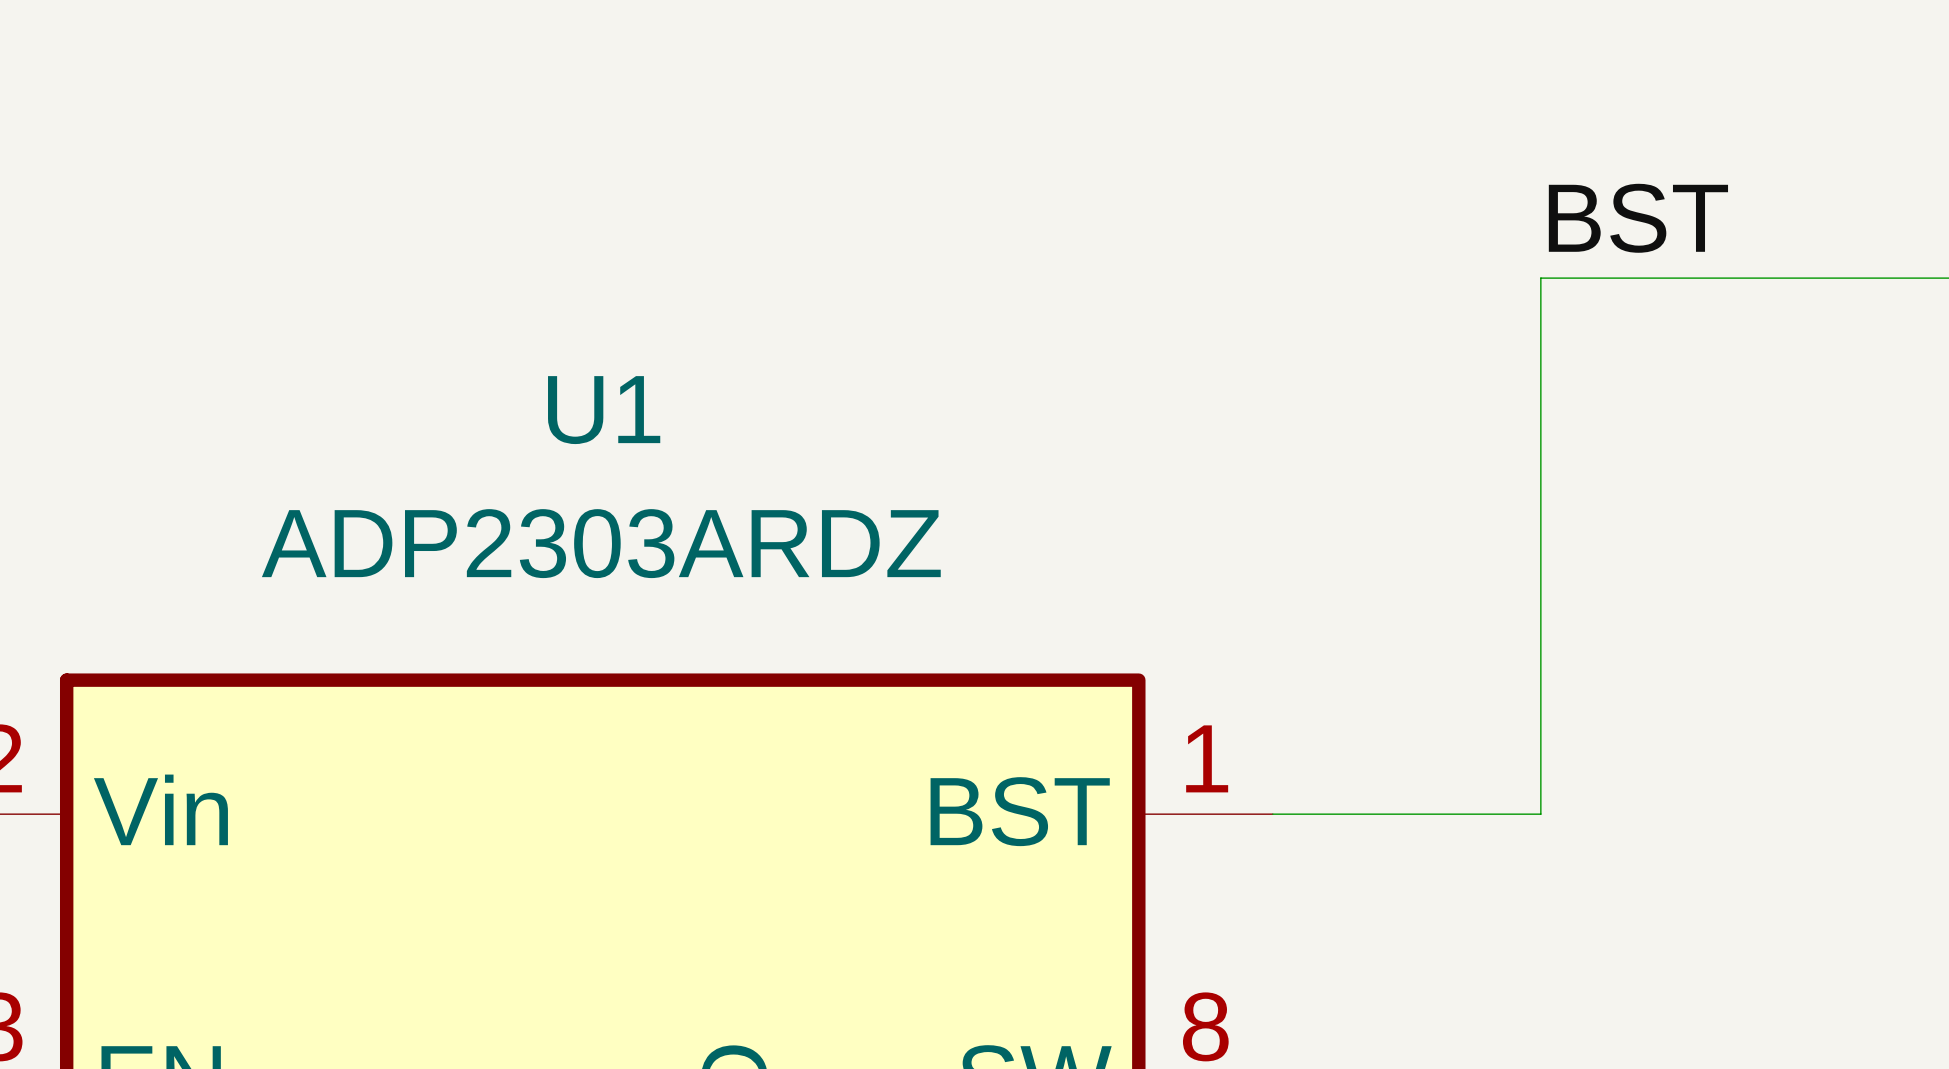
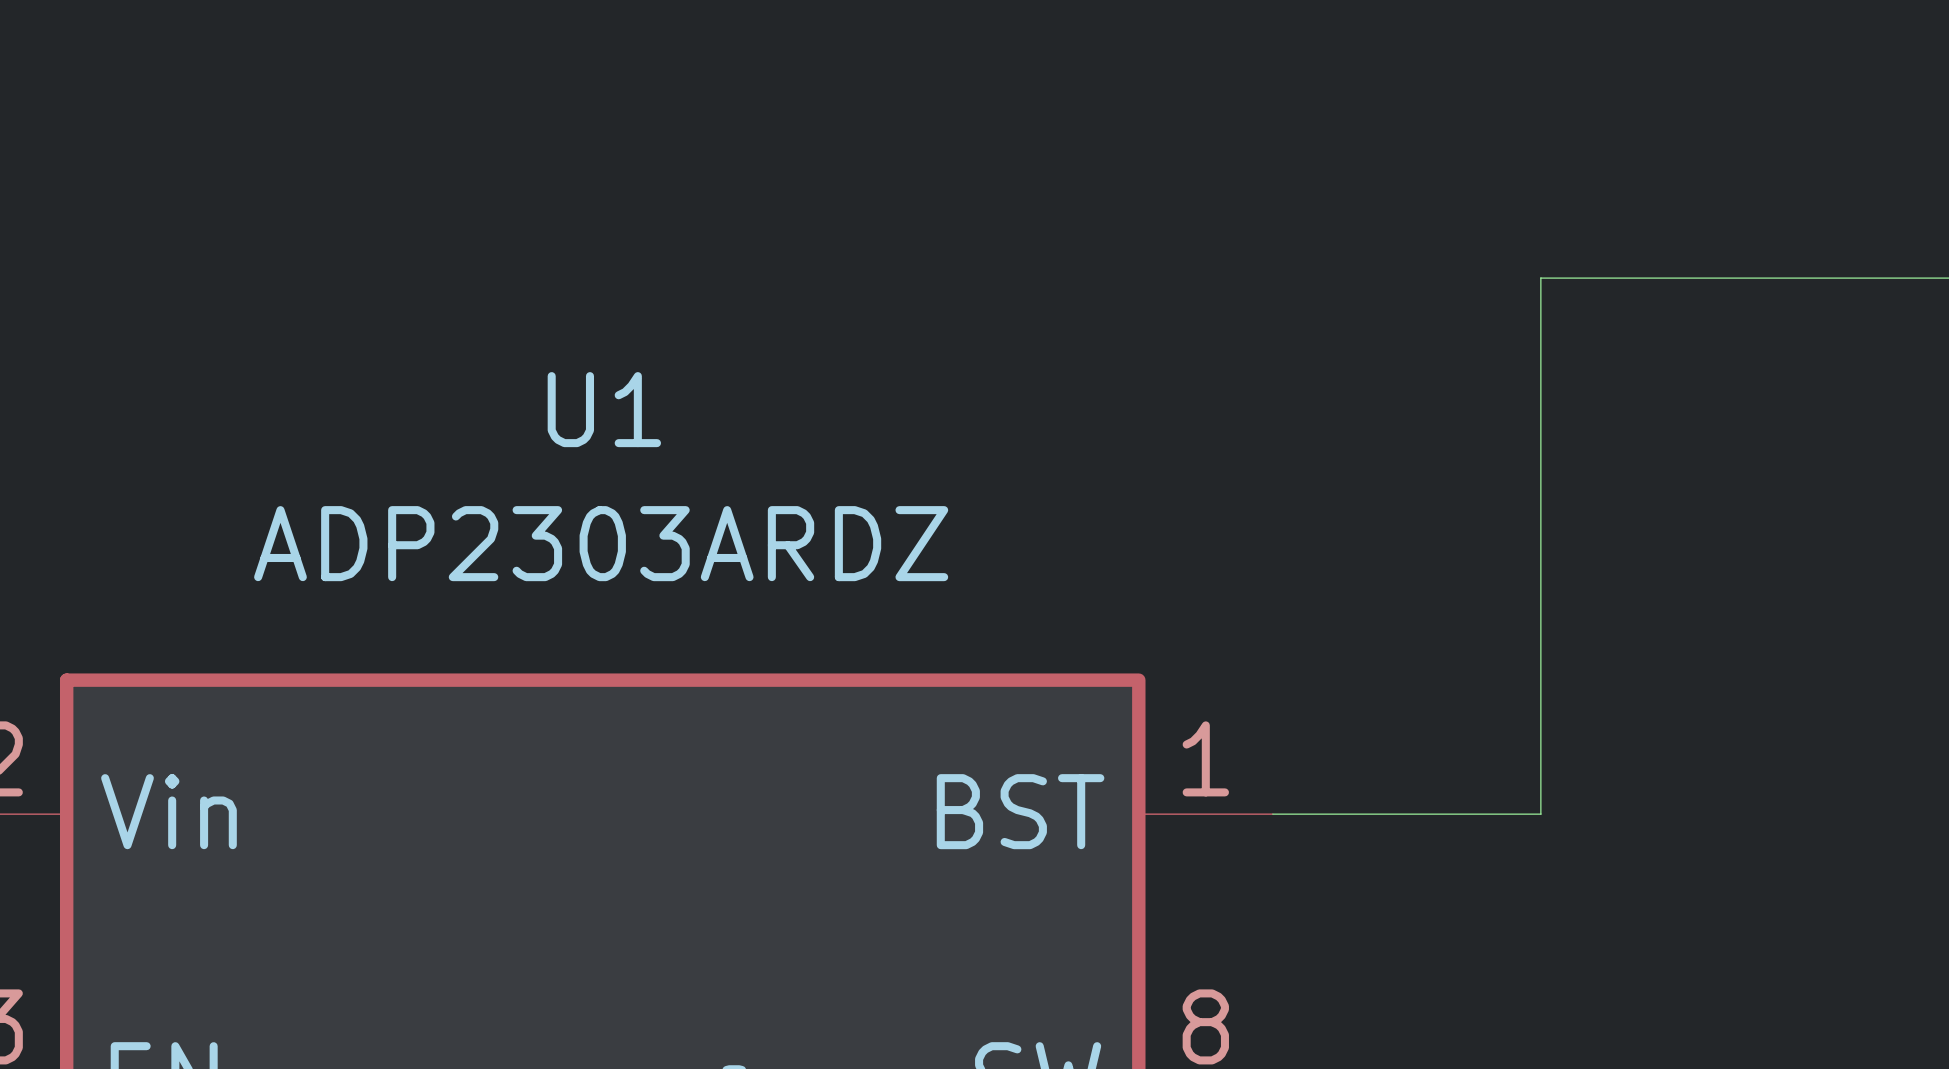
label: BST (1638, 218) -> none

